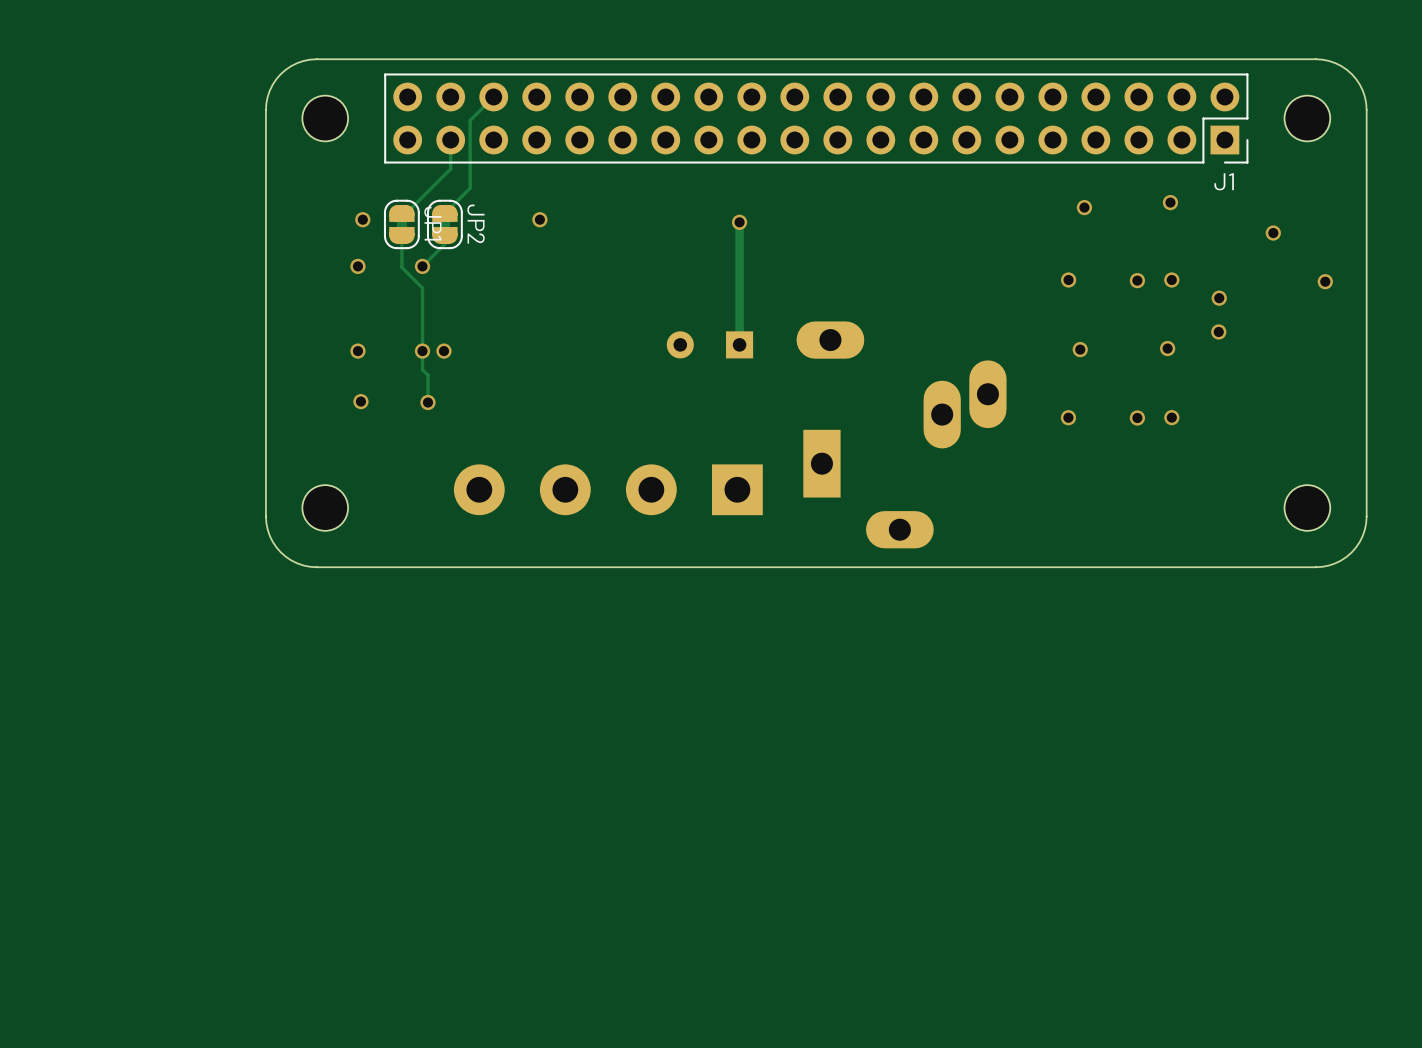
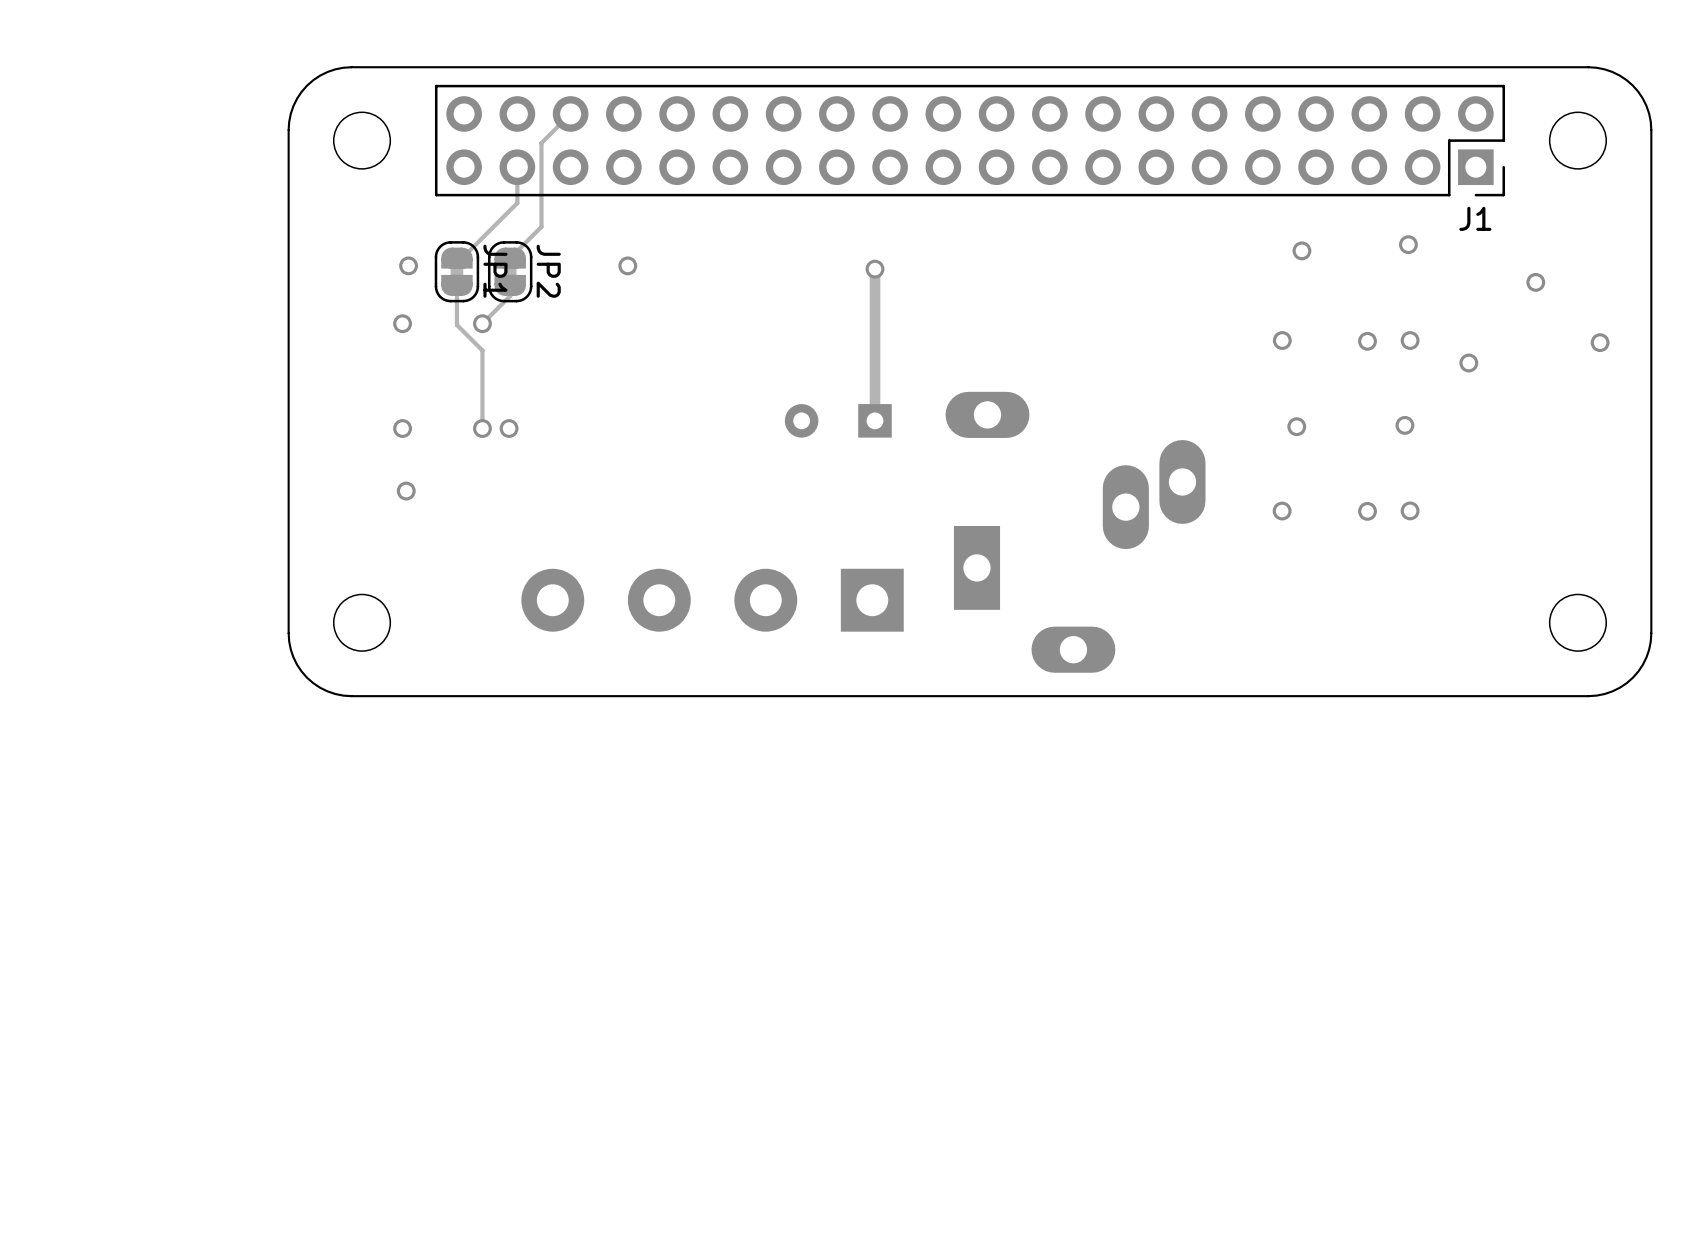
via: (1218, 331) -> none
track: (422, 351) (422, 369) (427, 375) (427, 402) -> none
via: (427, 402) -> none

